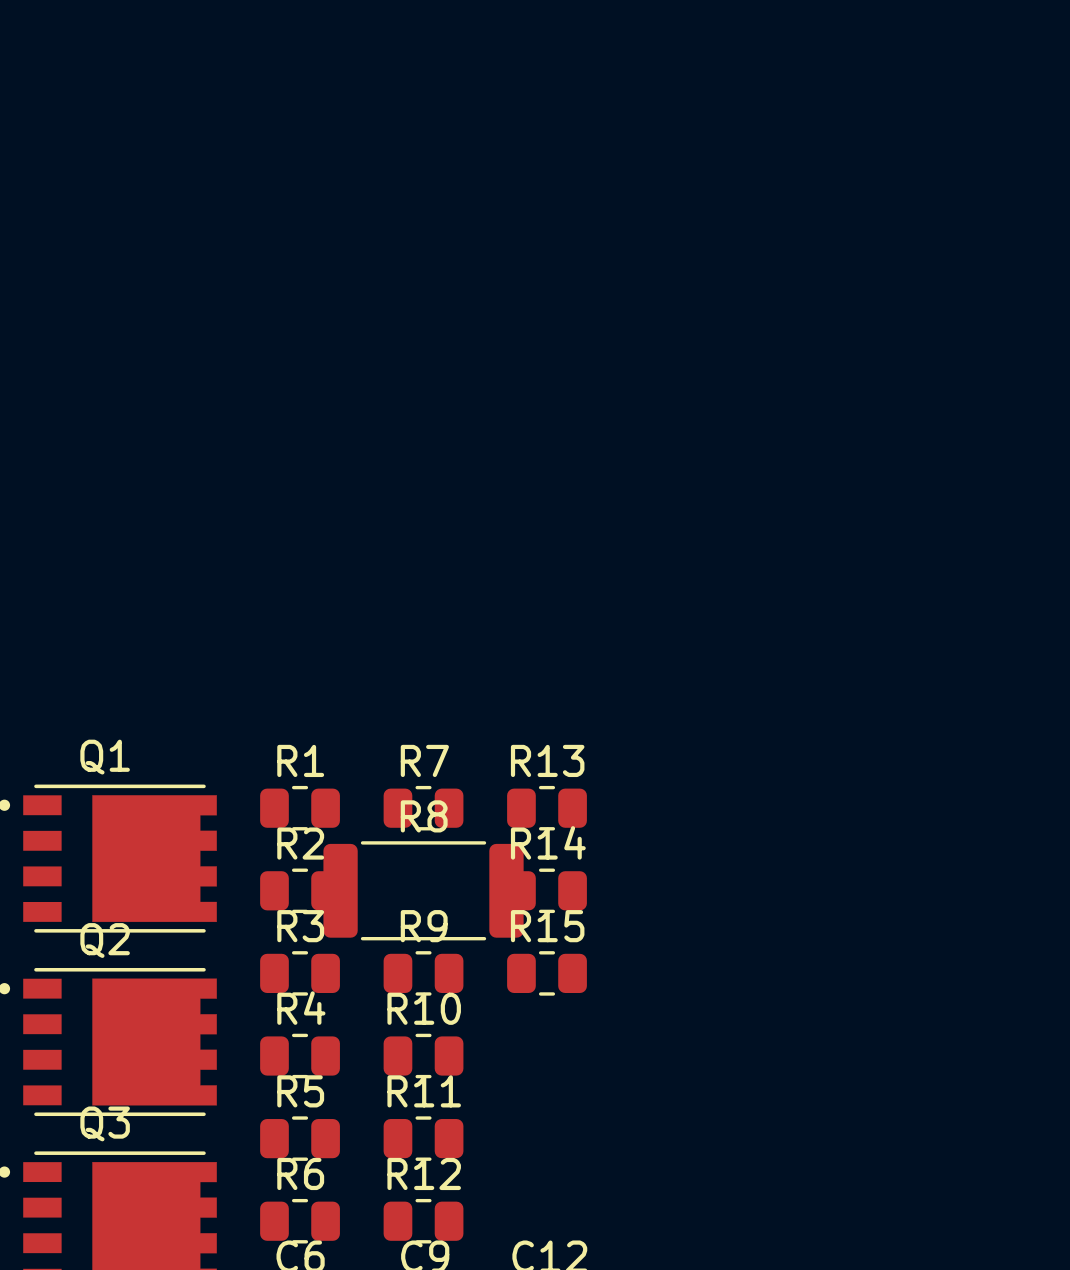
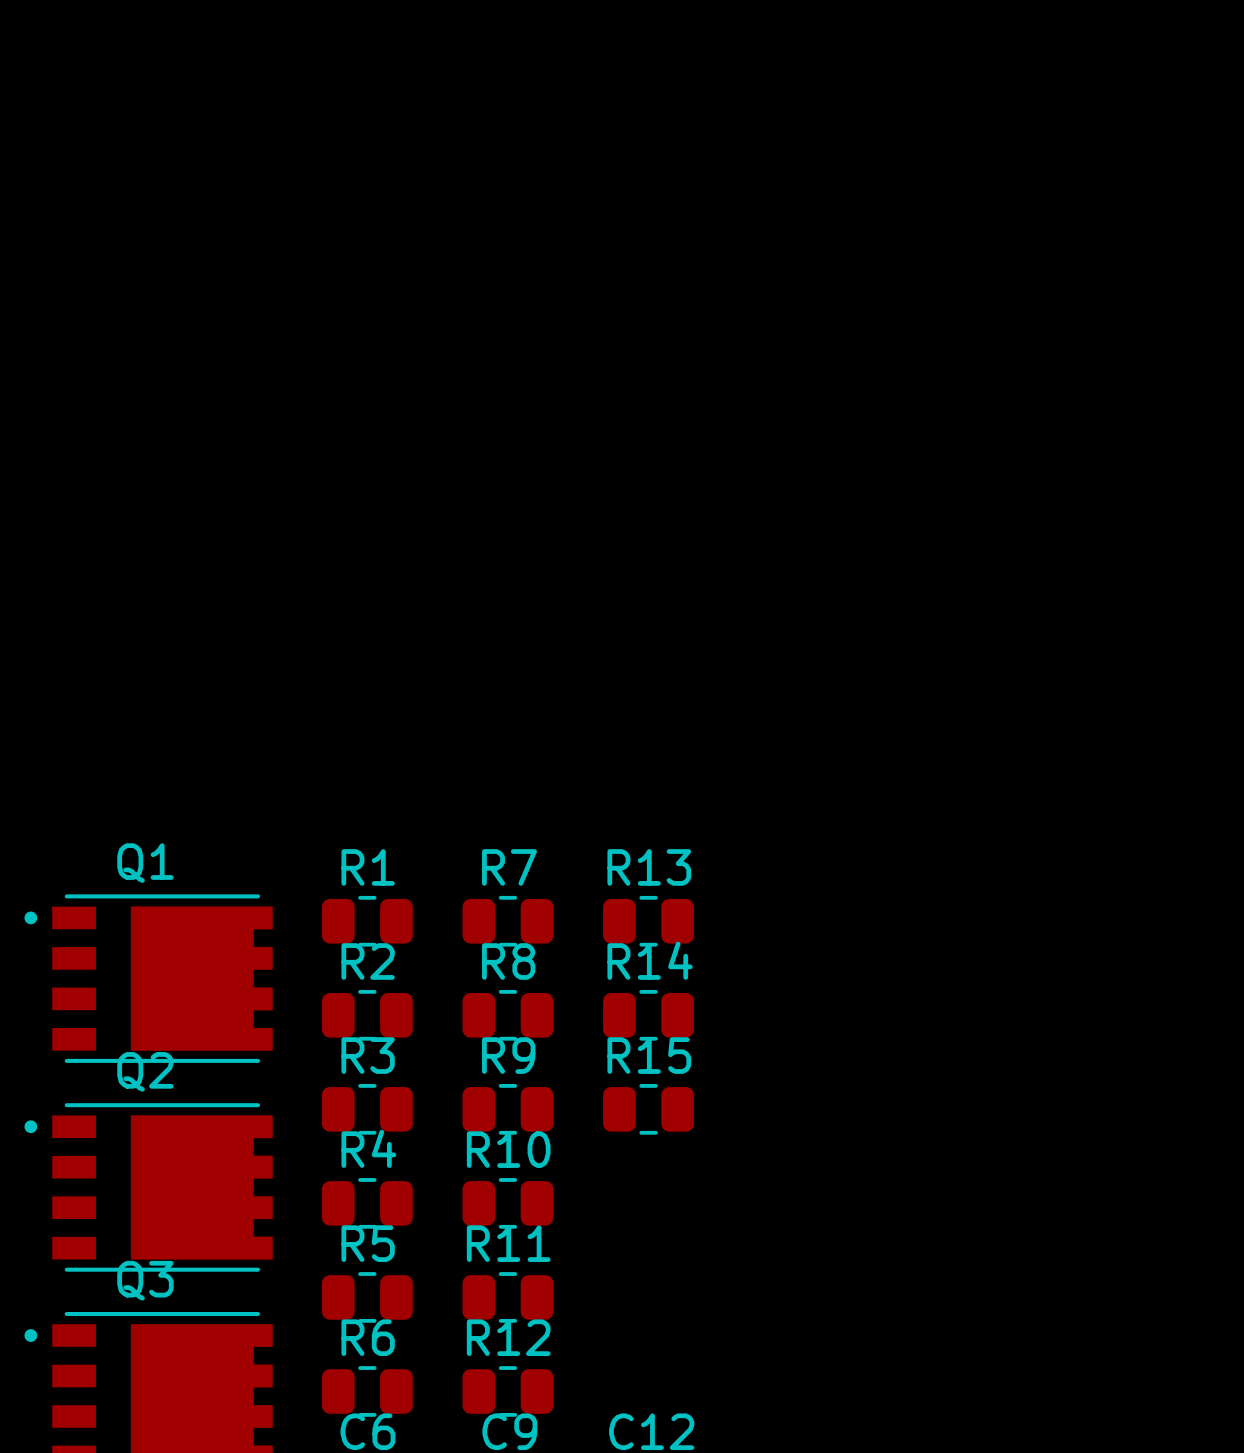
R8 footprint: [323, 841, 524, 941] -> [462, 989, 554, 1041]

